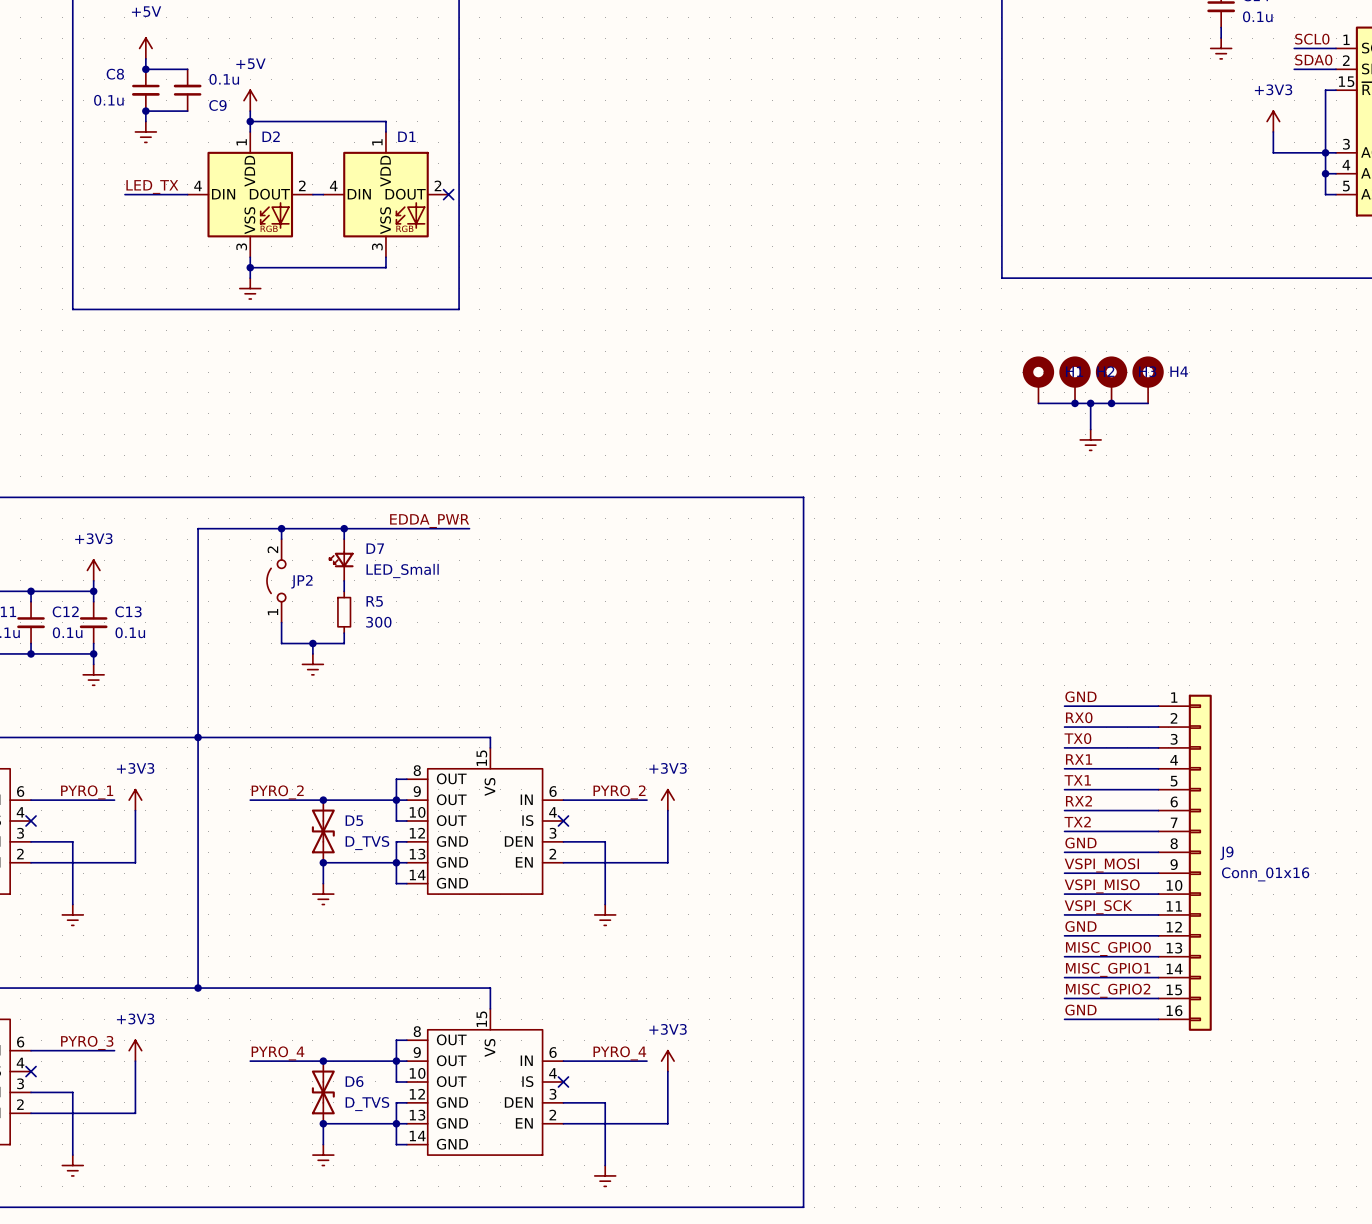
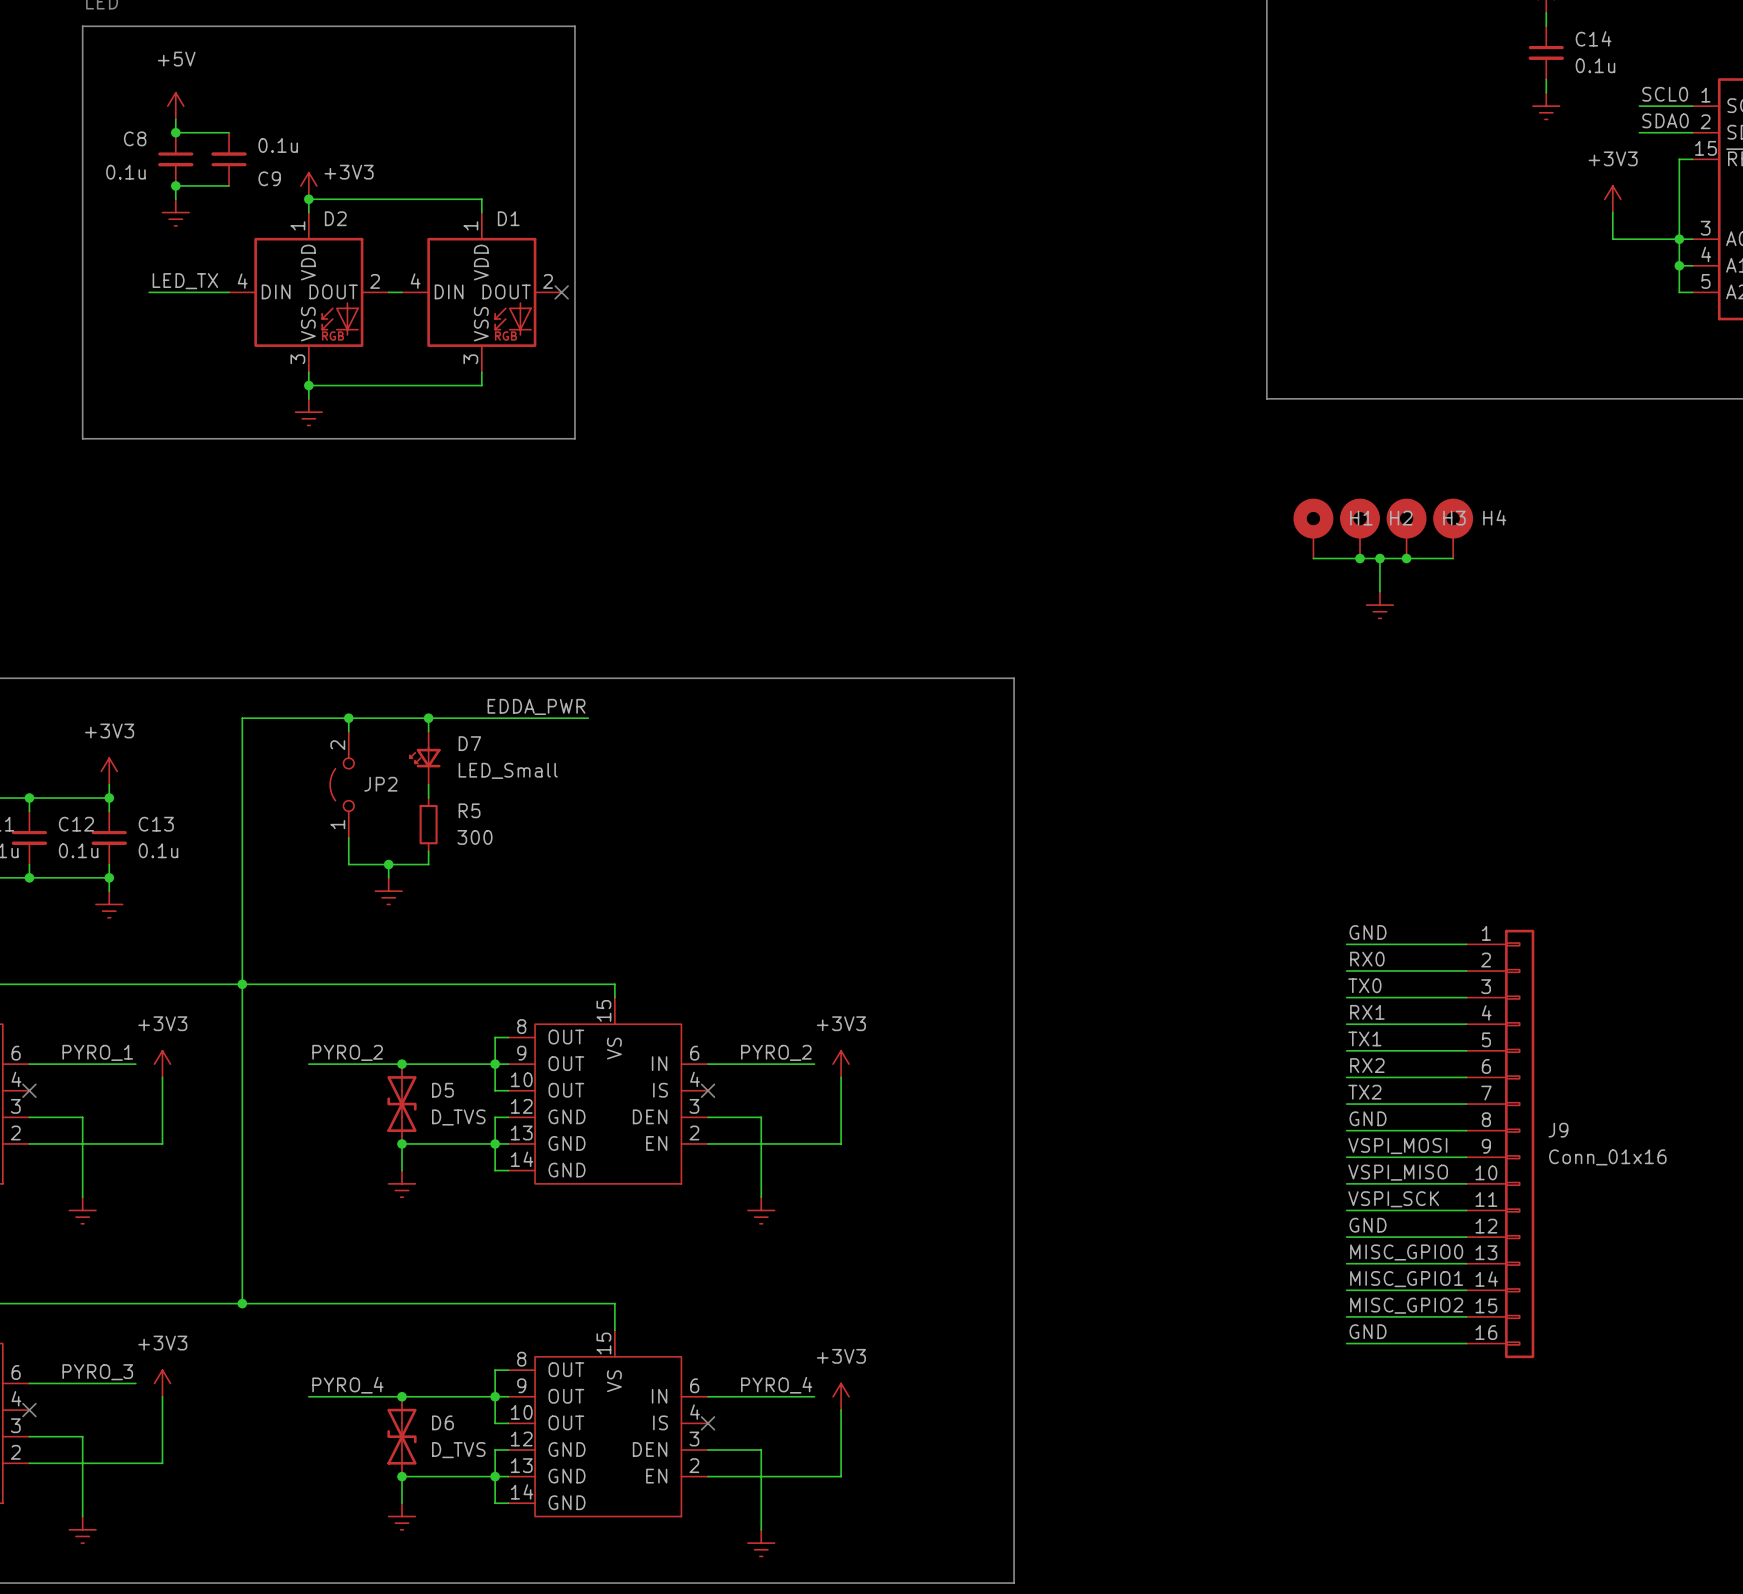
power symbol: +5V (250, 100) -> none
power symbol: none -> +3V3 (308, 185)

